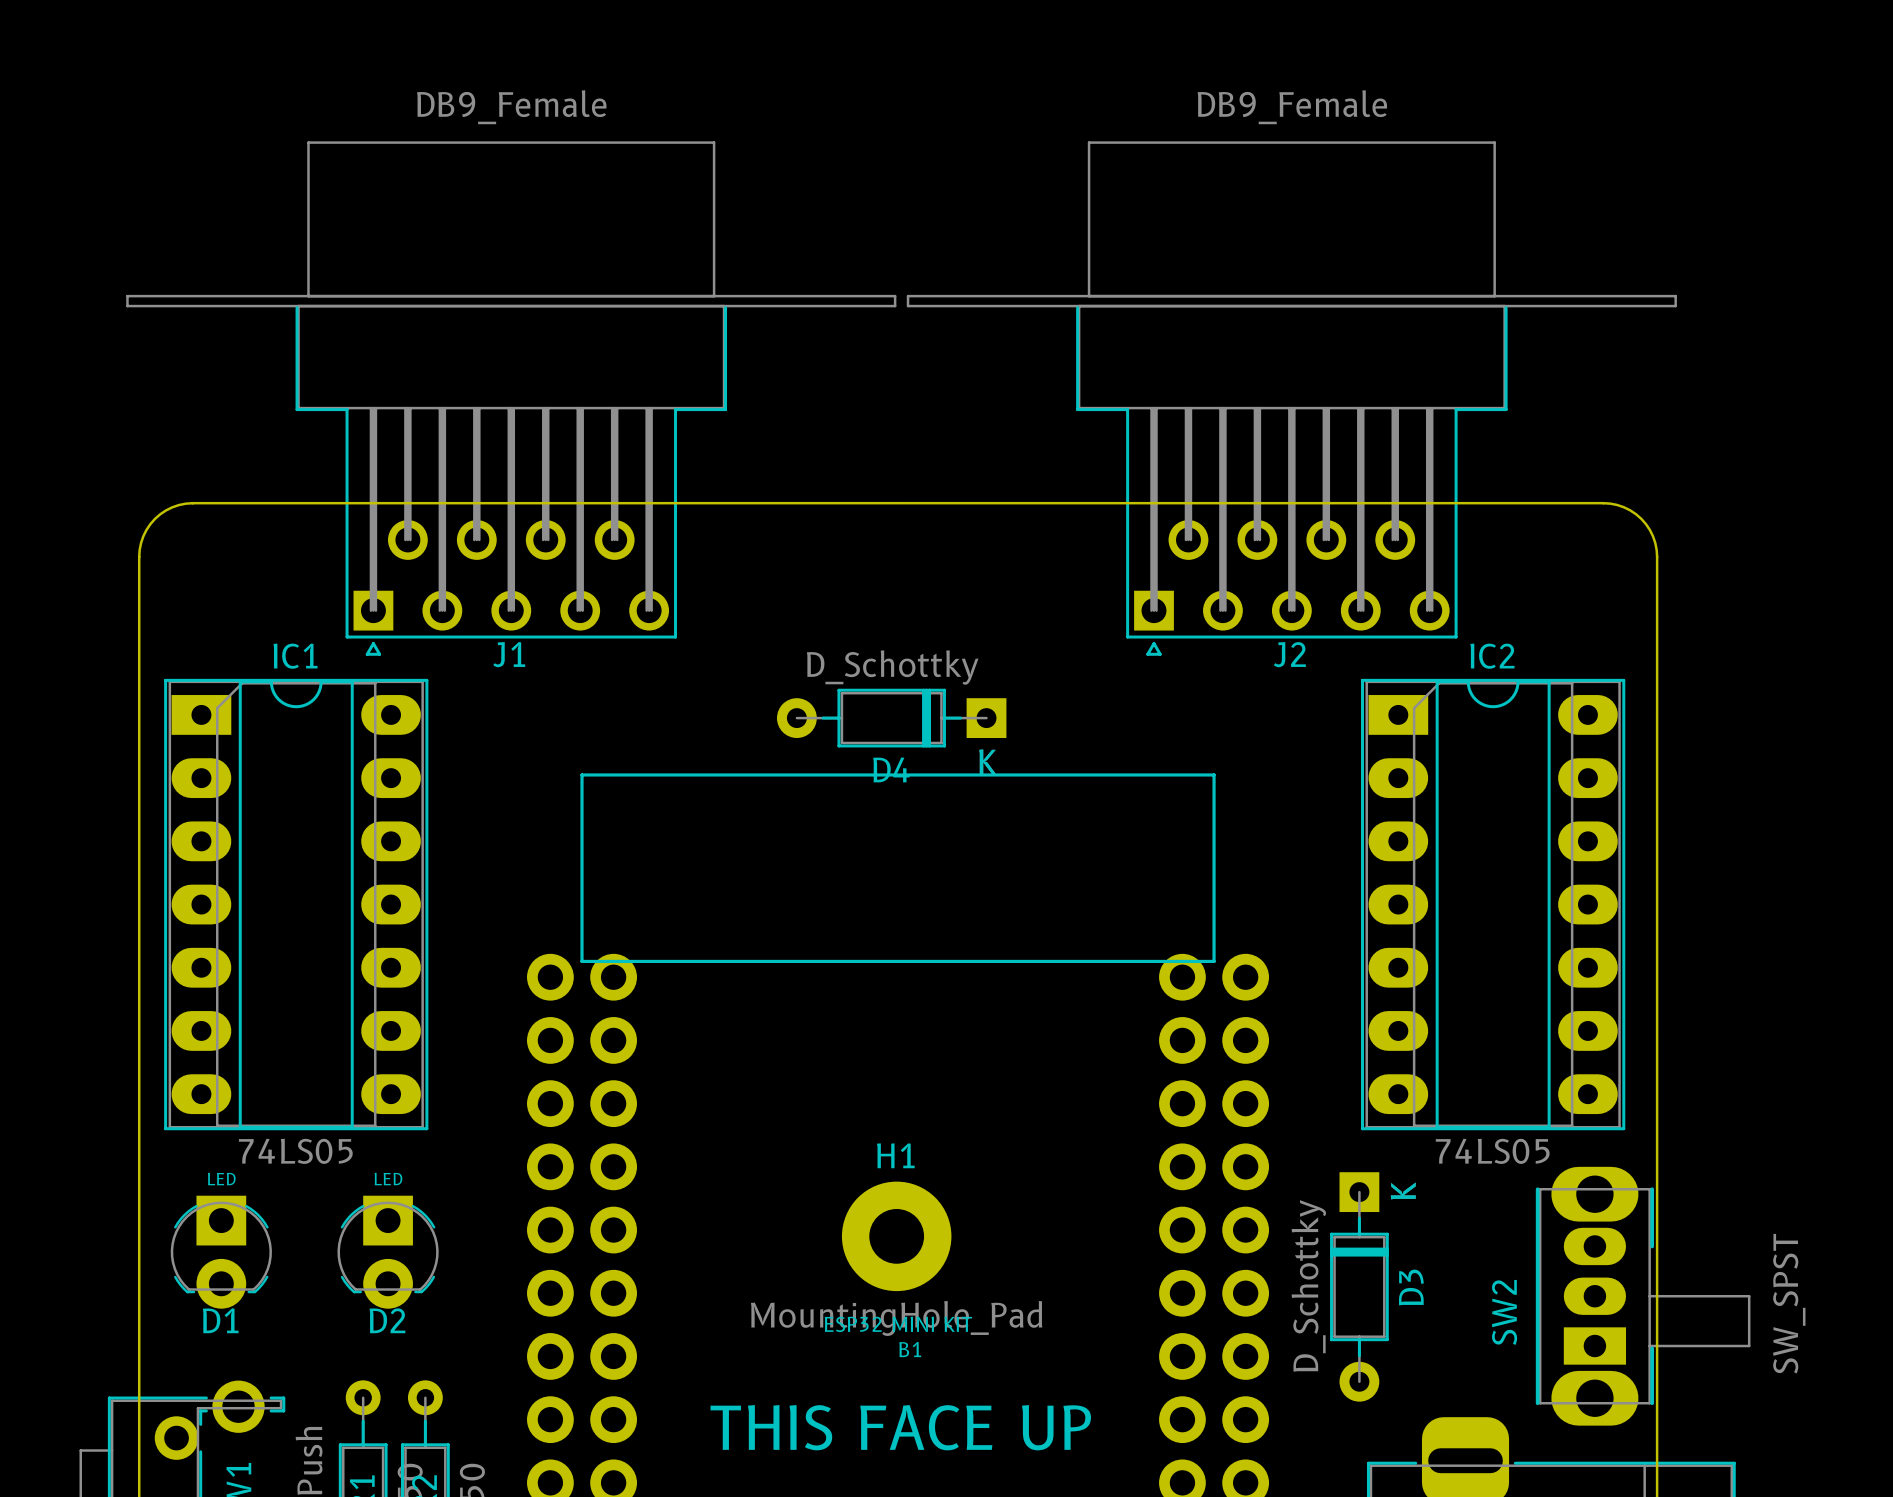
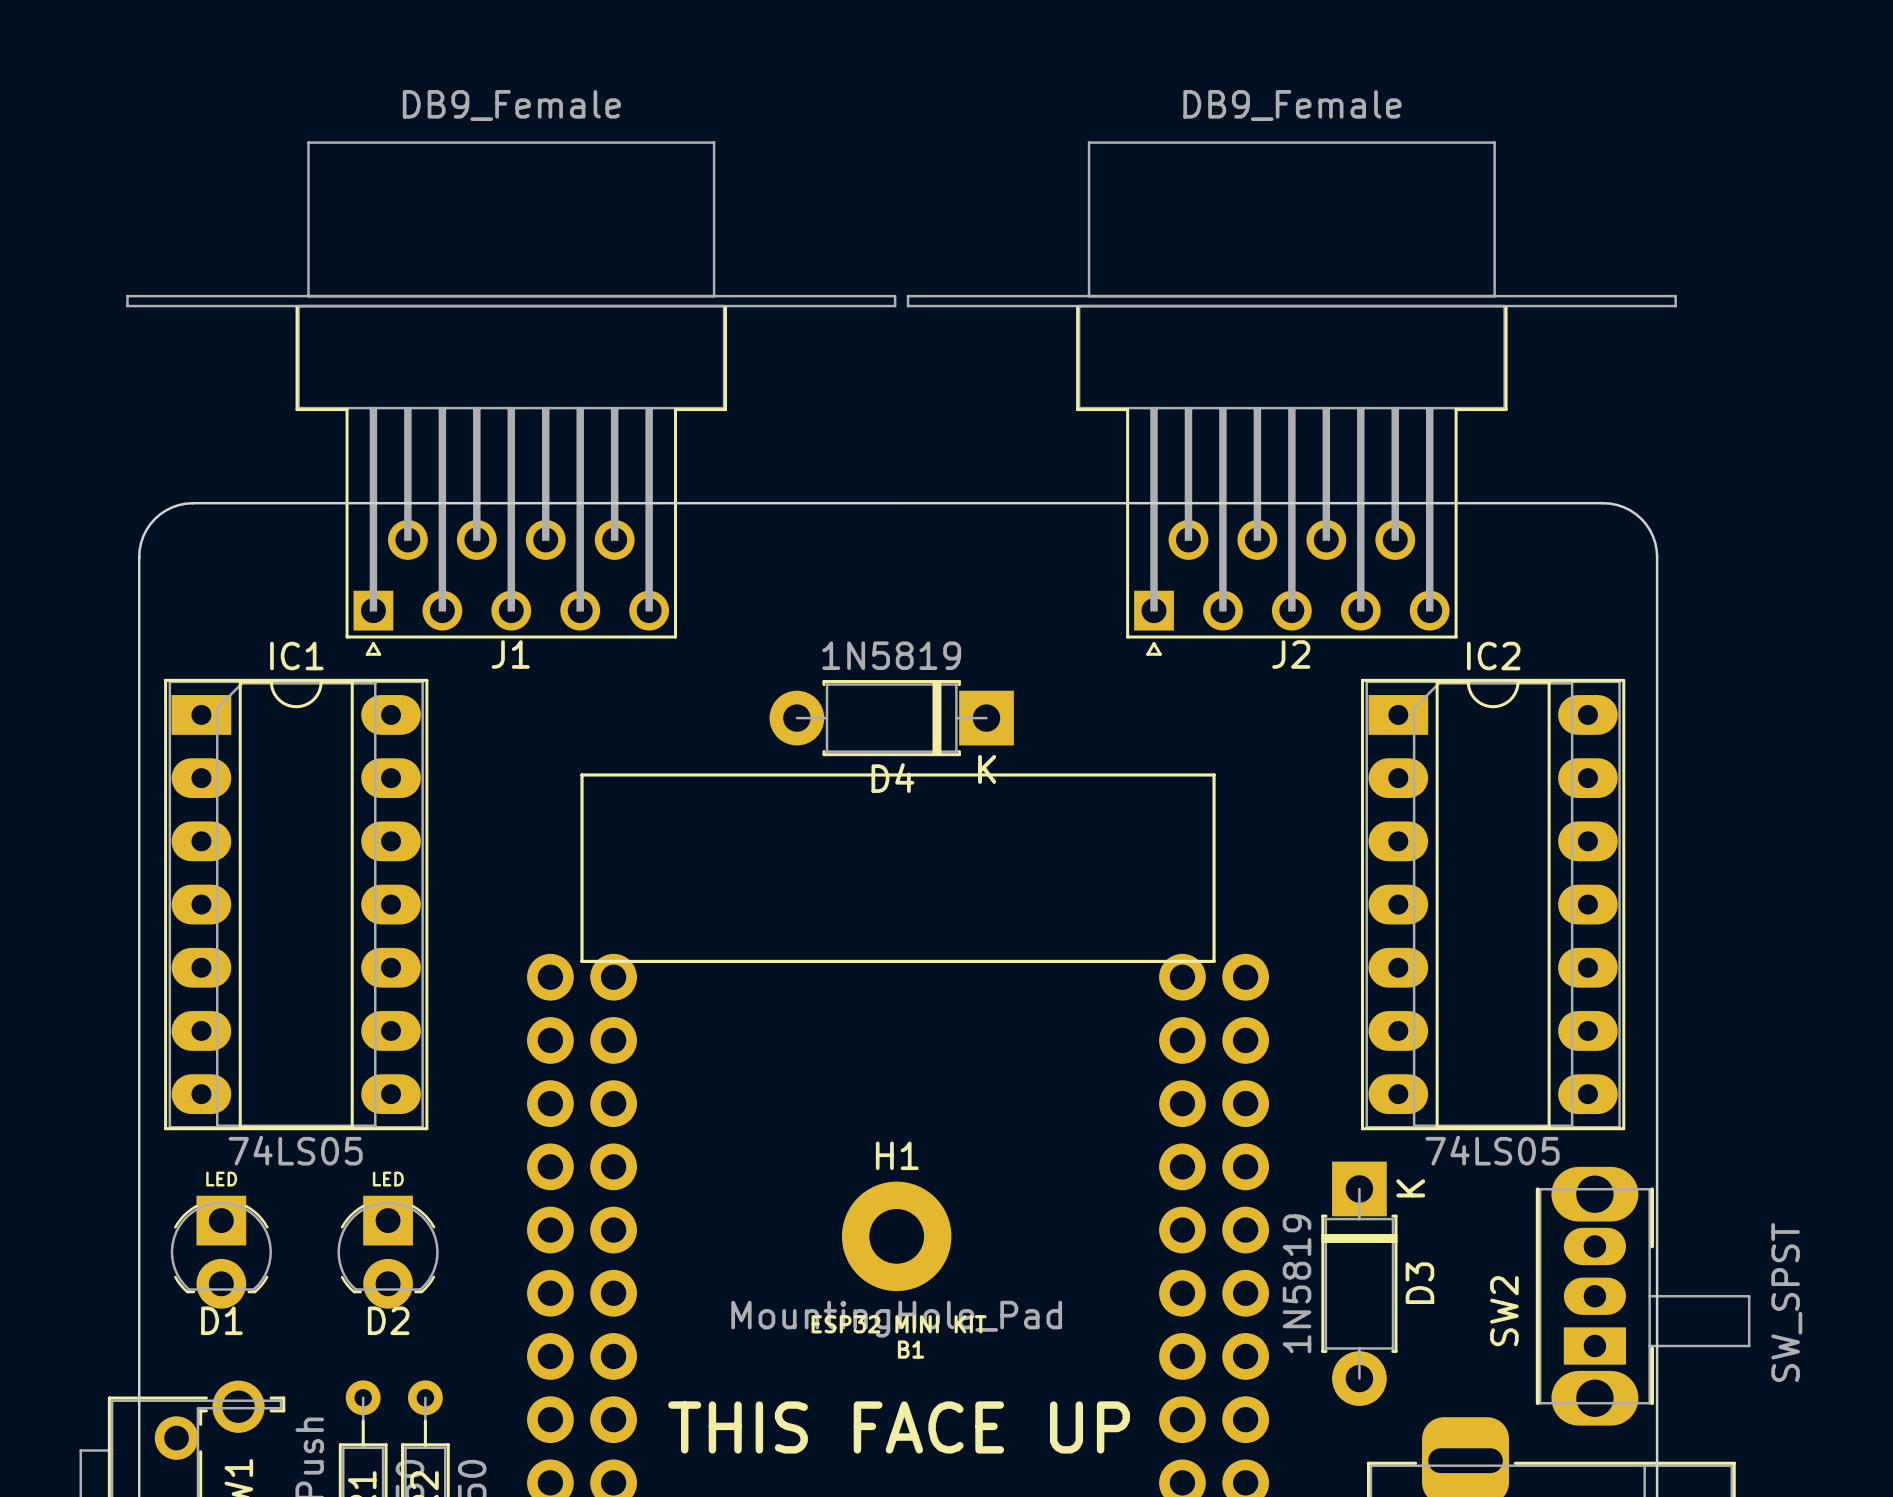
D4 value: D_Schottky (892, 667) -> 1N5819 (891, 655)
D4 footprint: [776, 688, 1007, 748] -> [769, 680, 1014, 757]
D3 footprint: [1330, 1172, 1389, 1402] -> [1321, 1161, 1398, 1406]
D3 value: D_Schottky (1308, 1285) -> 1N5819 (1297, 1283)

